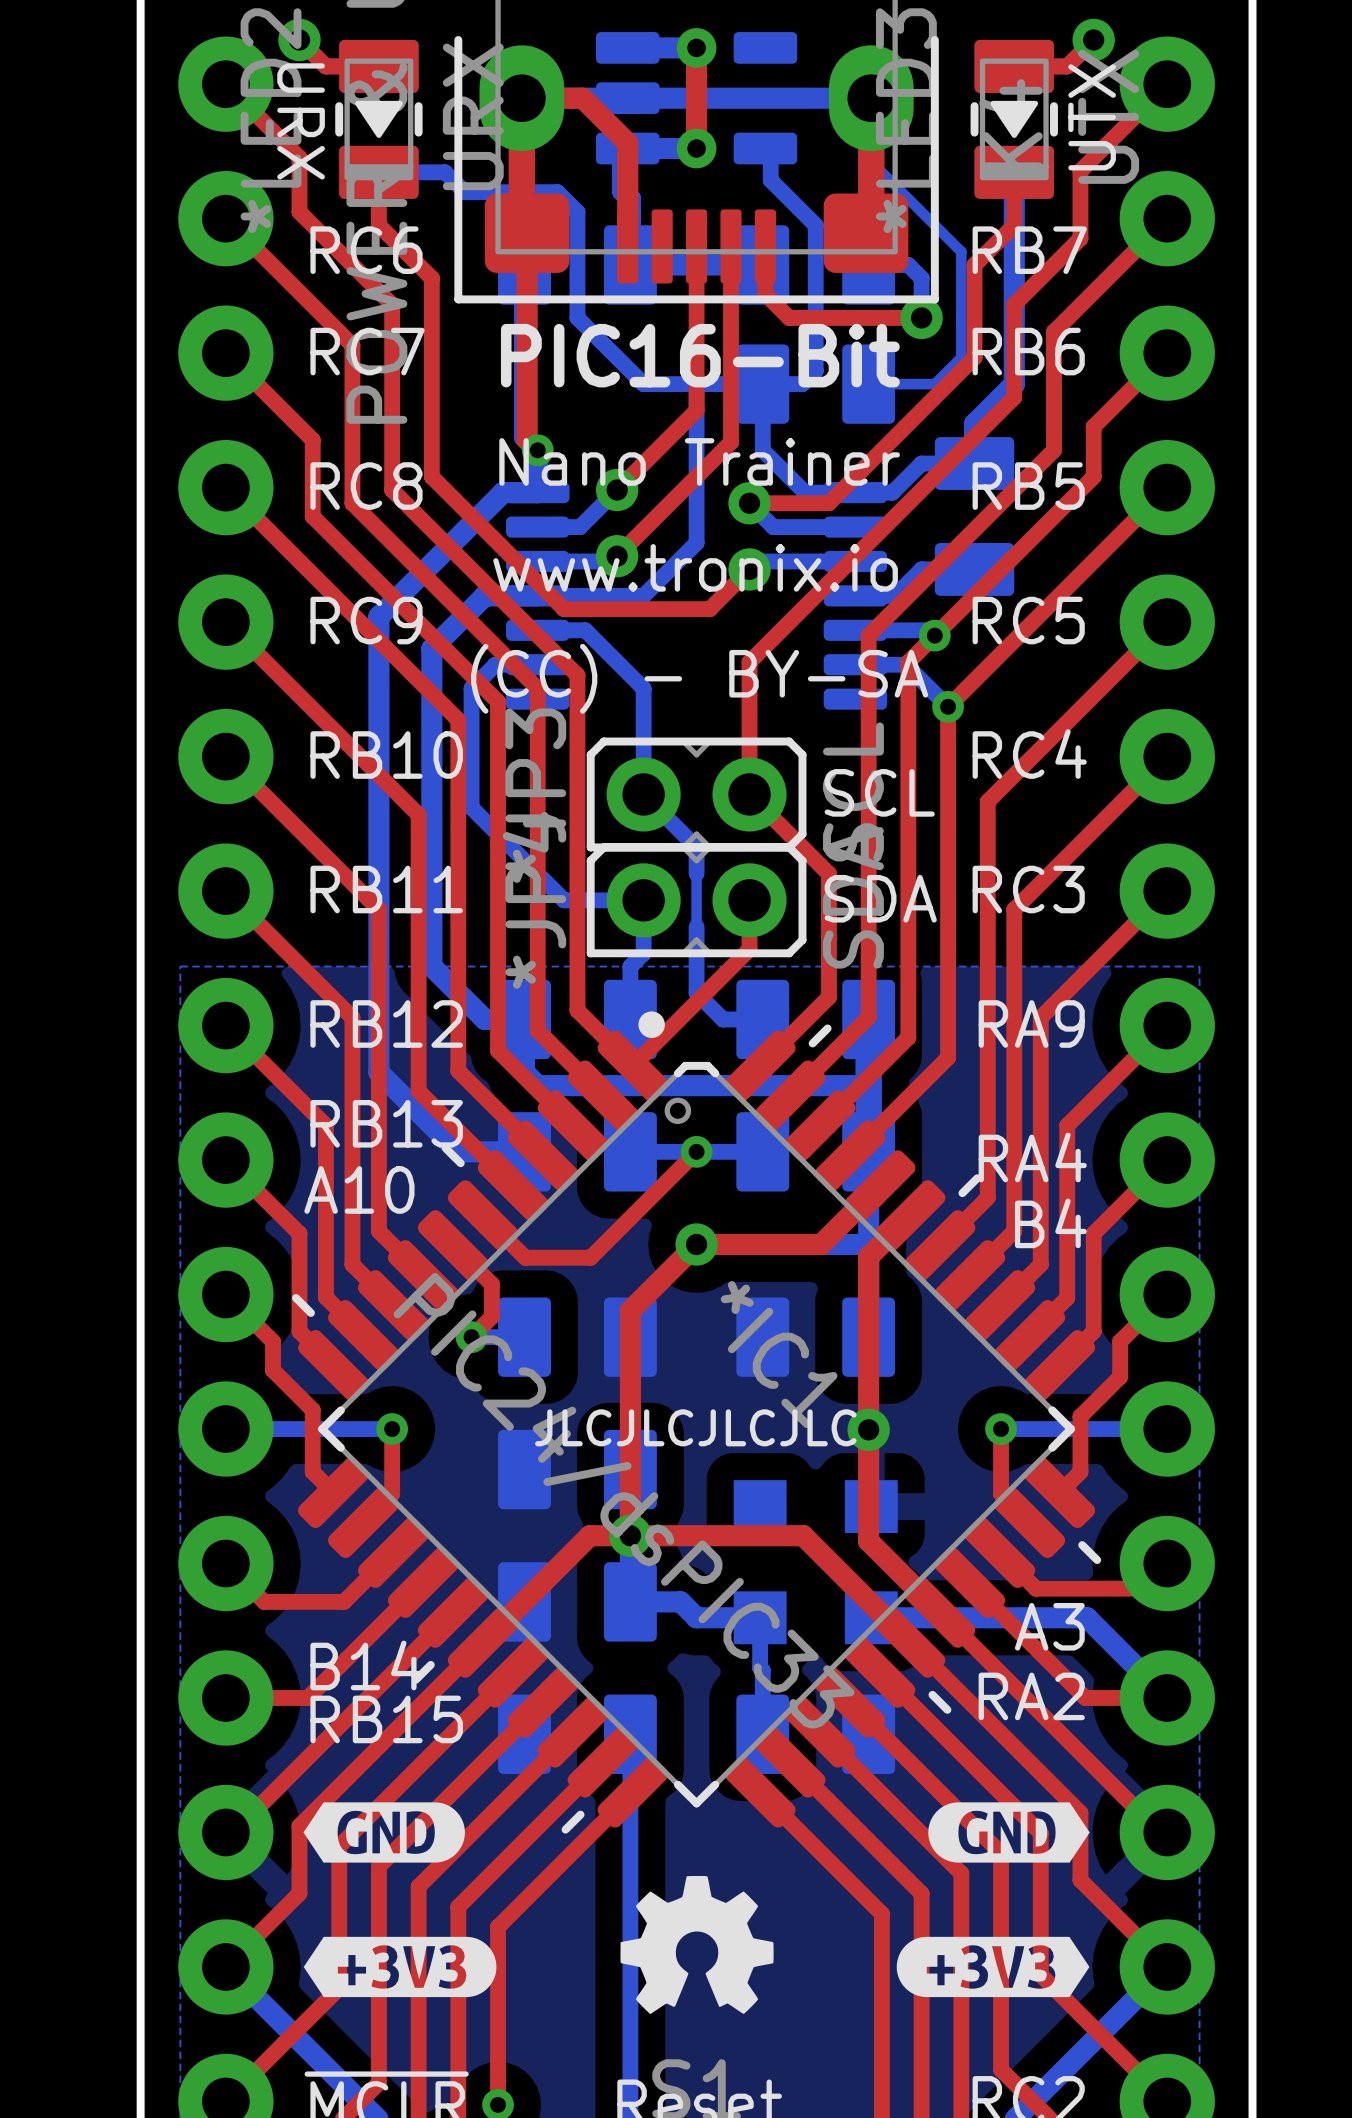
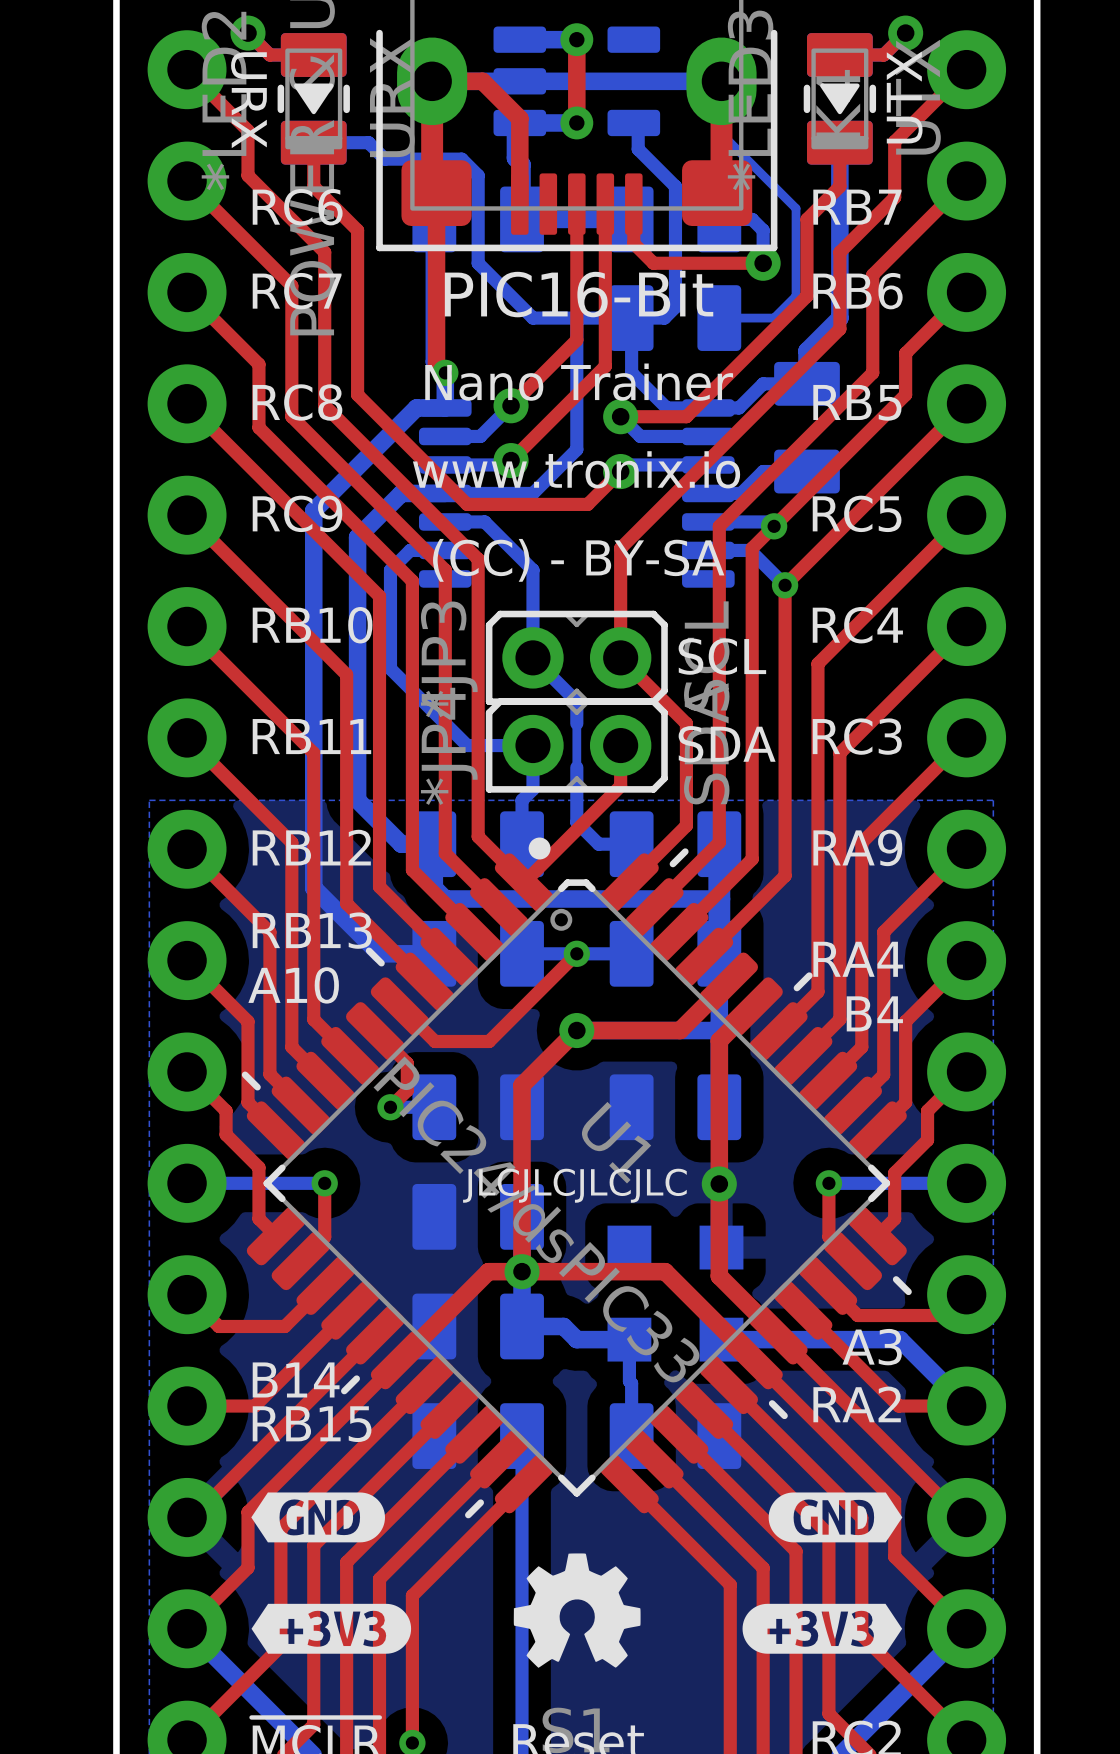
*IC1 name: *IC1 (779, 1354) -> U1 (616, 1142)
*IC1 value position: PIC24/dsPIC33 (624, 1500) -> PIC24/dsPIC33 (536, 1219)

